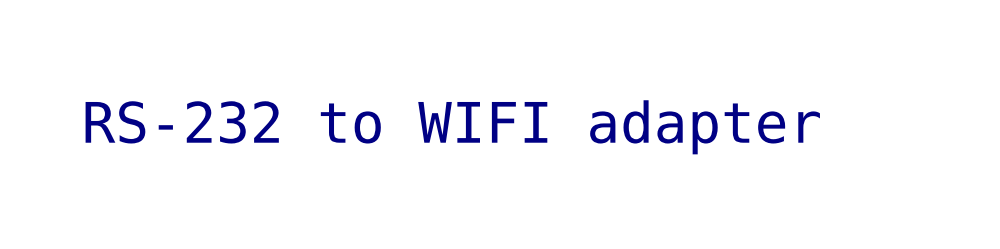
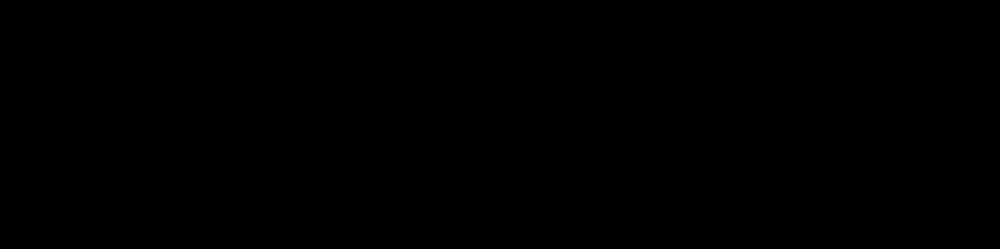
text: RS-232 to WIFI adapter (452, 127) -> none

